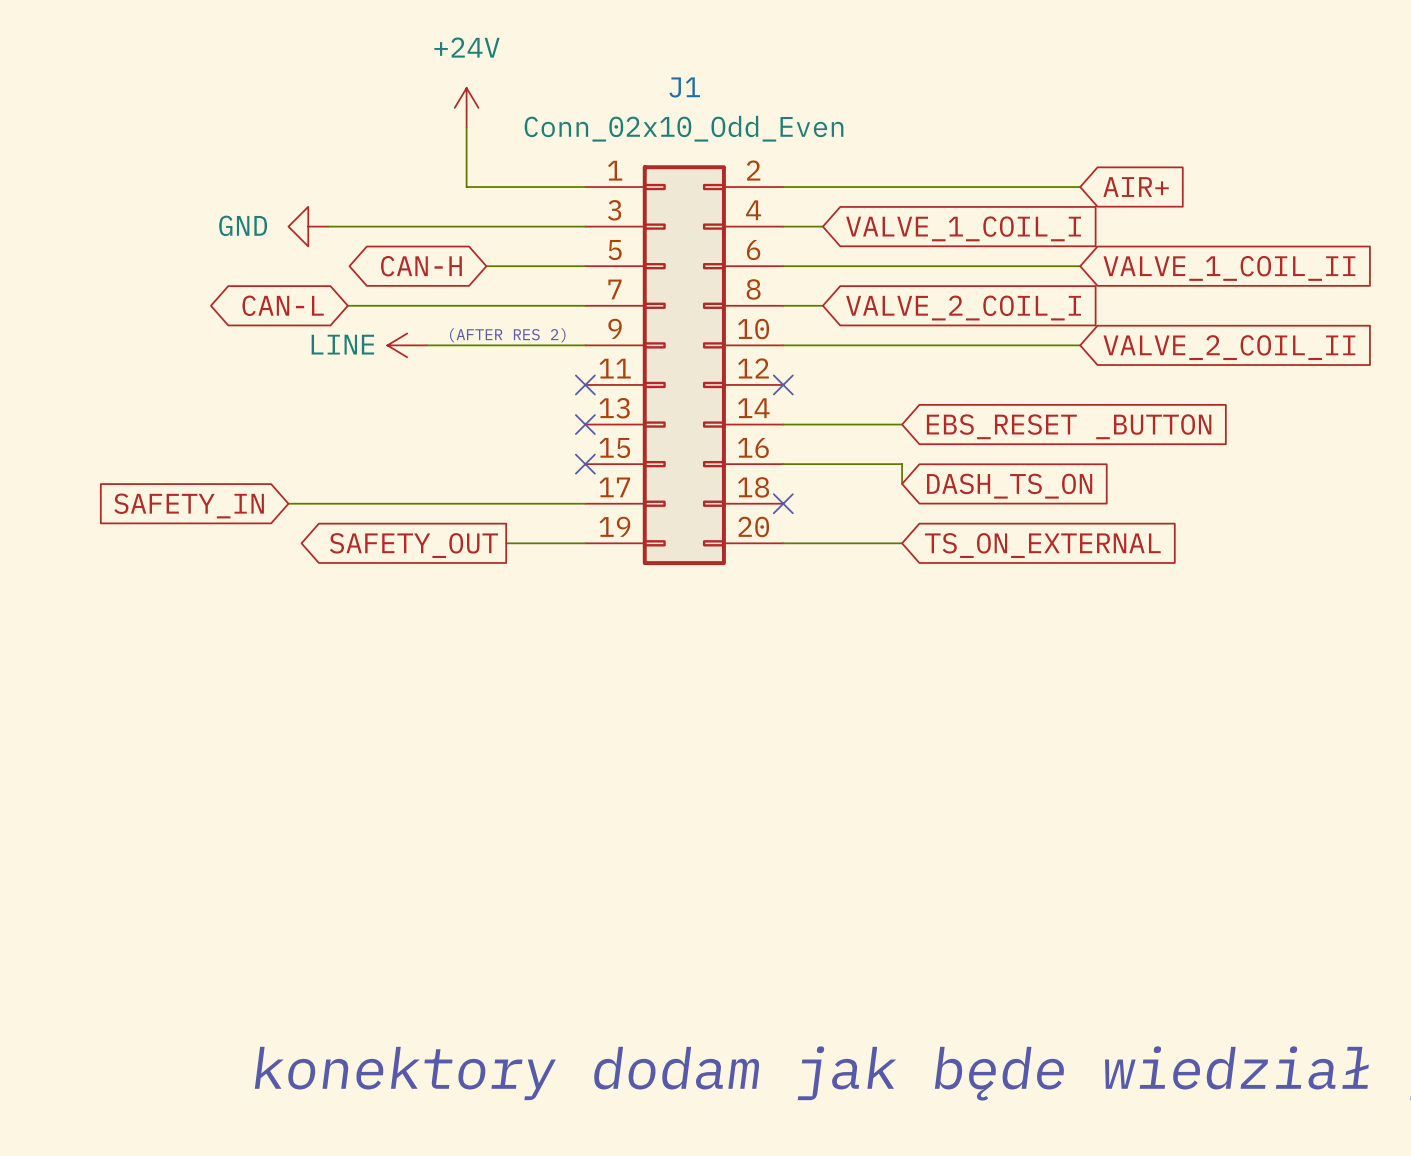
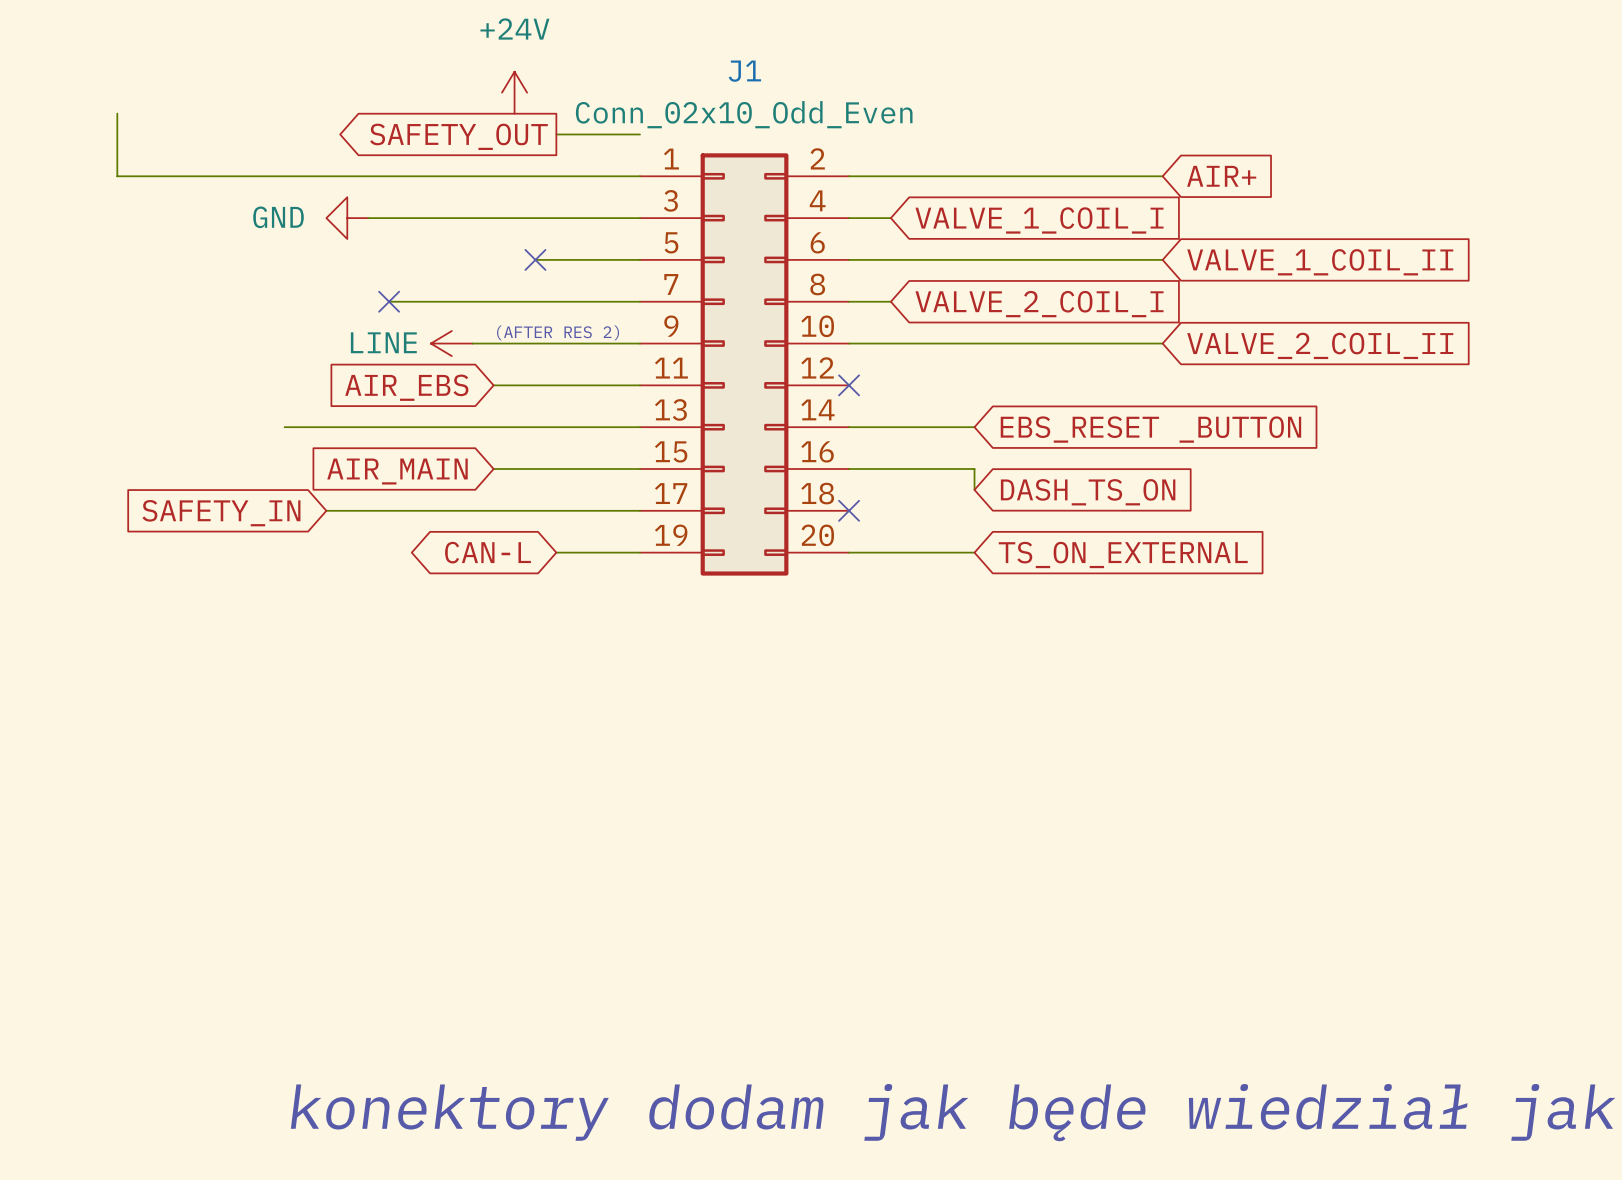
wire: (466, 127) (466, 187) -> (117, 113) (117, 176) (514, 176)
wire: none -> (556, 134) (639, 134)
global label: none -> SAFETY_OUT (458, 136)
global label: CAN-H (421, 266) -> none
no-connect mark: none -> (535, 259)
global label: CAN-L (283, 305) -> none
no-connect mark: none -> (389, 301)
wire: none -> (493, 385) (639, 385)
no-connect mark: (585, 384) -> none
global label: none -> AIR_EBS (406, 387)
wire: none -> (284, 427) (639, 427)
no-connect mark: (585, 424) -> none
wire: none -> (493, 468) (639, 468)
no-connect mark: (585, 464) -> none
global label: none -> AIR_MAIN (397, 471)
global label shape: output (413, 545) -> bidirectional (487, 552)
global label: SAFETY_OUT (413, 545) -> CAN-L (487, 552)

